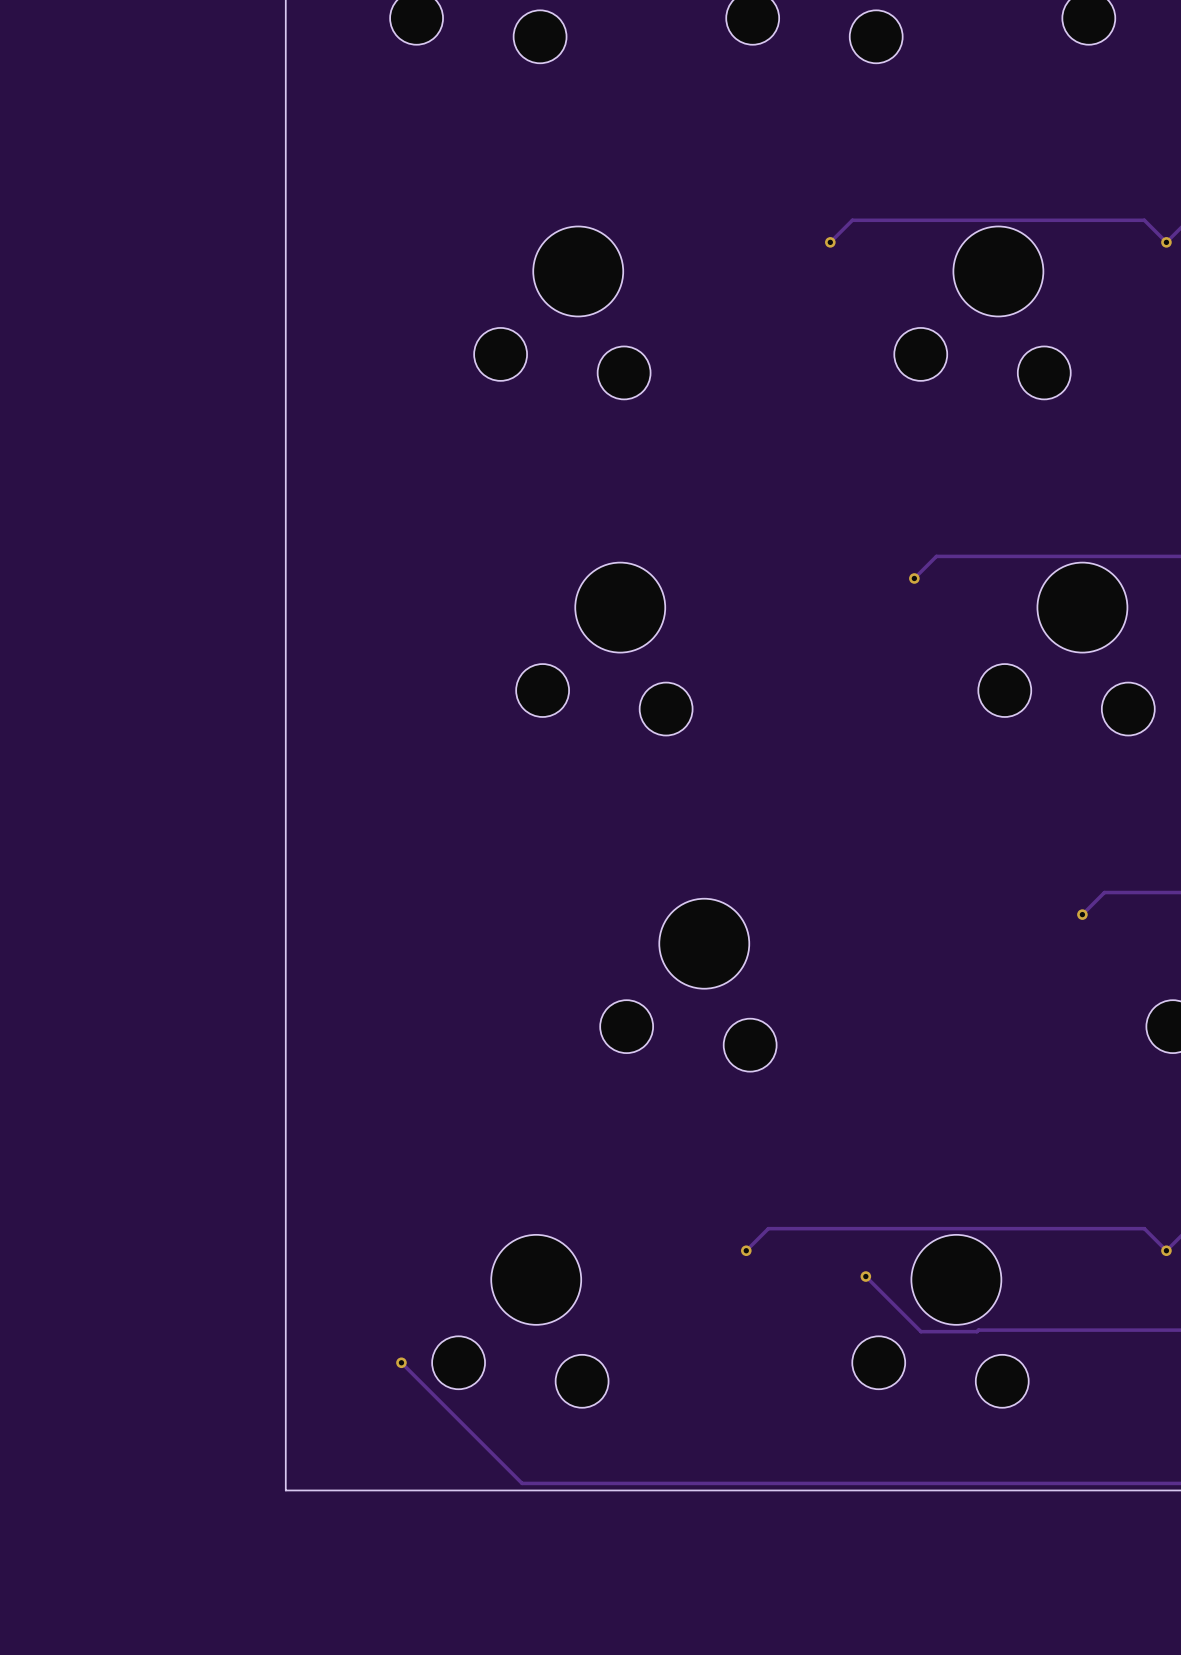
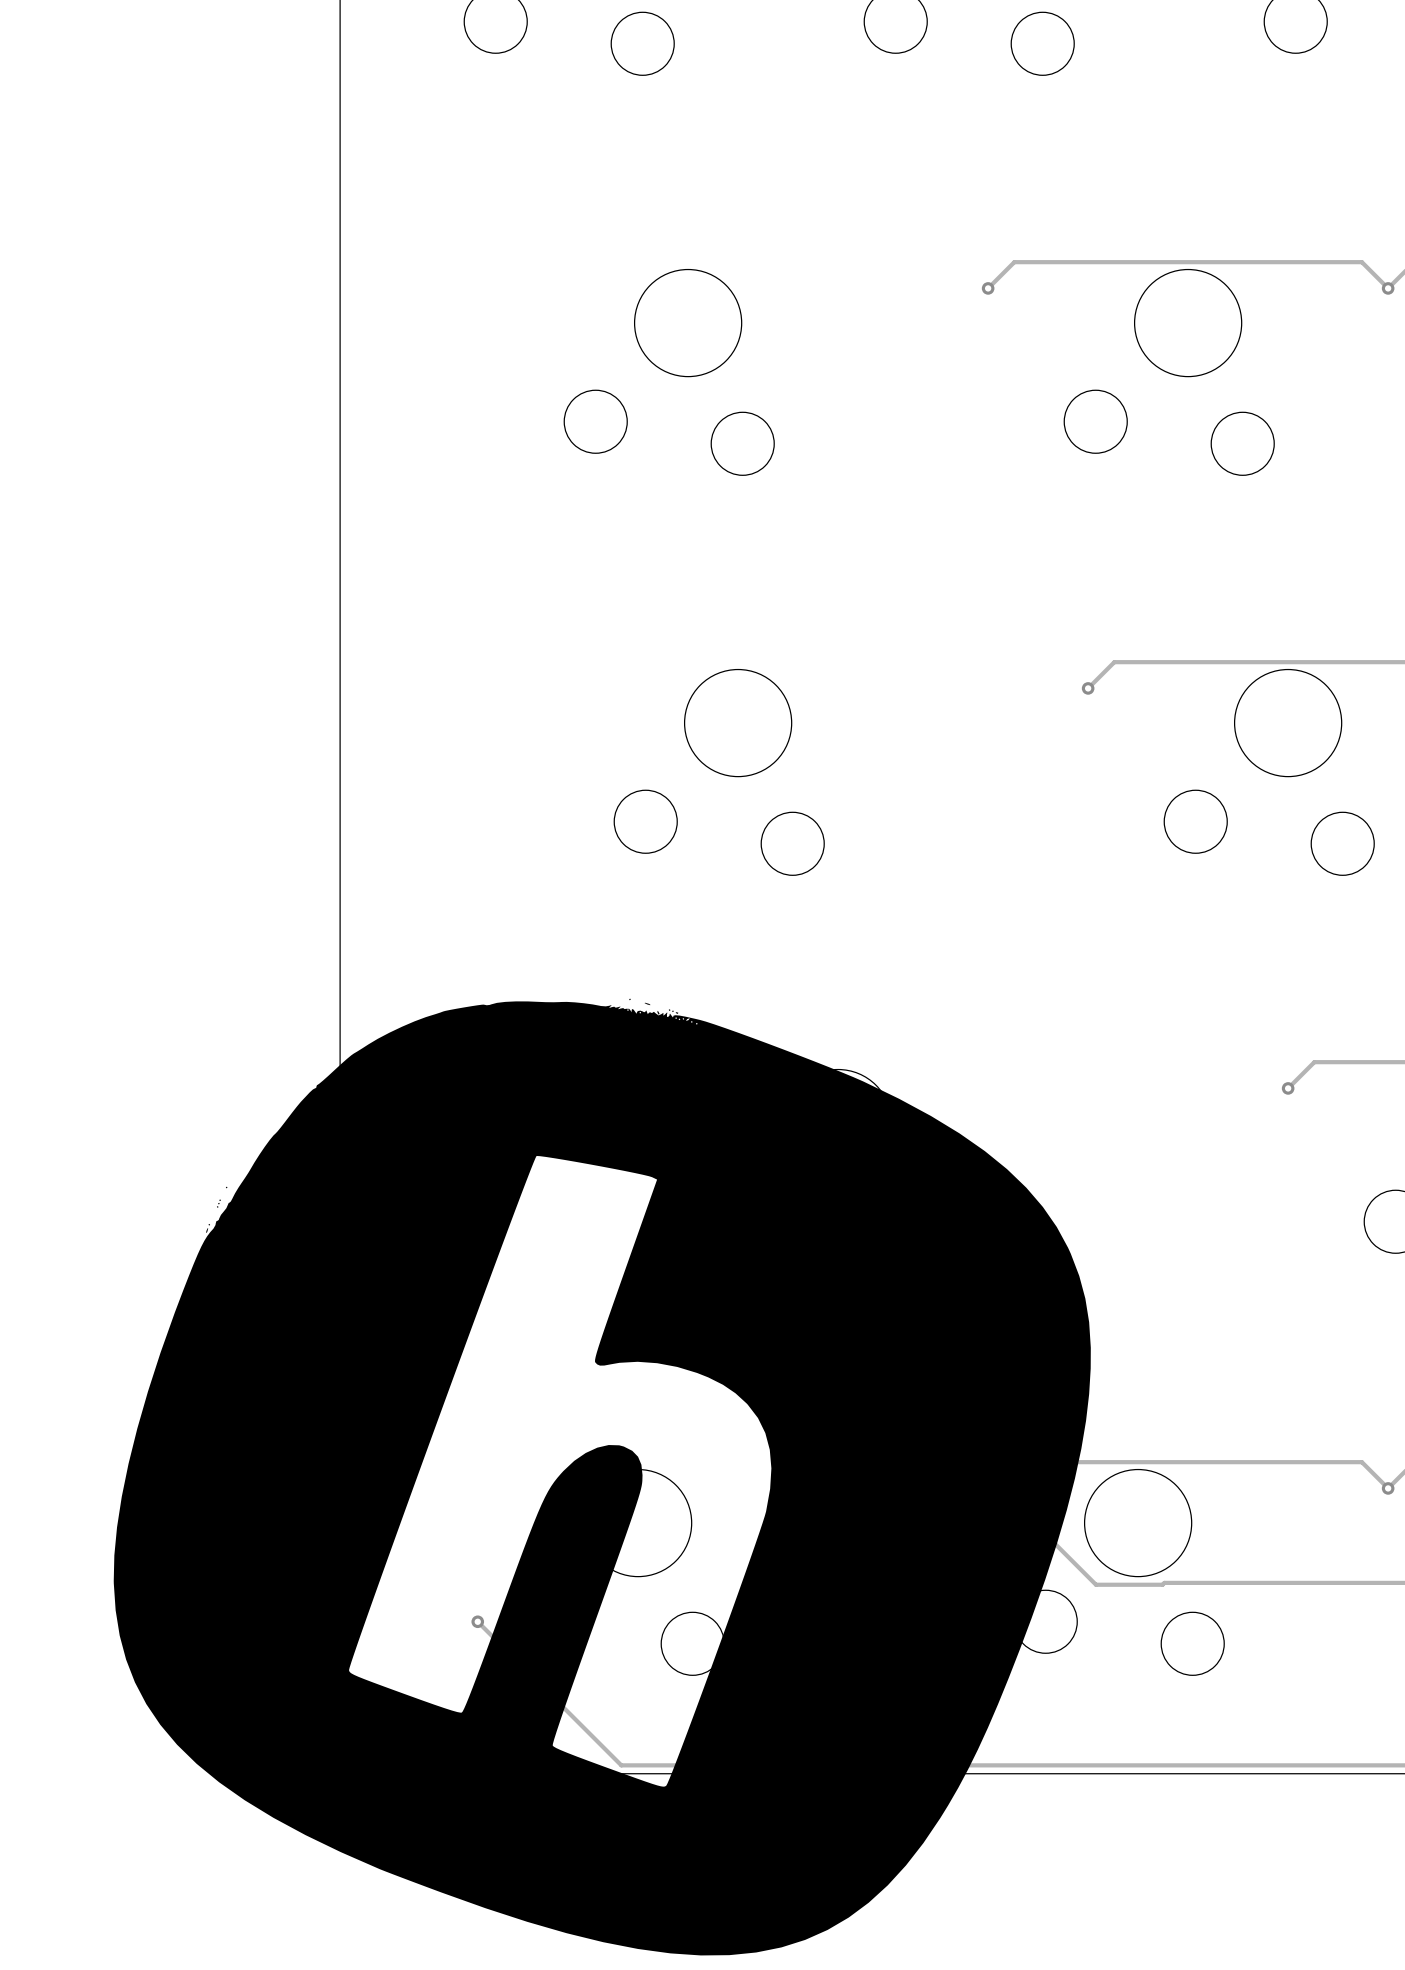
drawing: none -> [113, 998, 1091, 1956]

